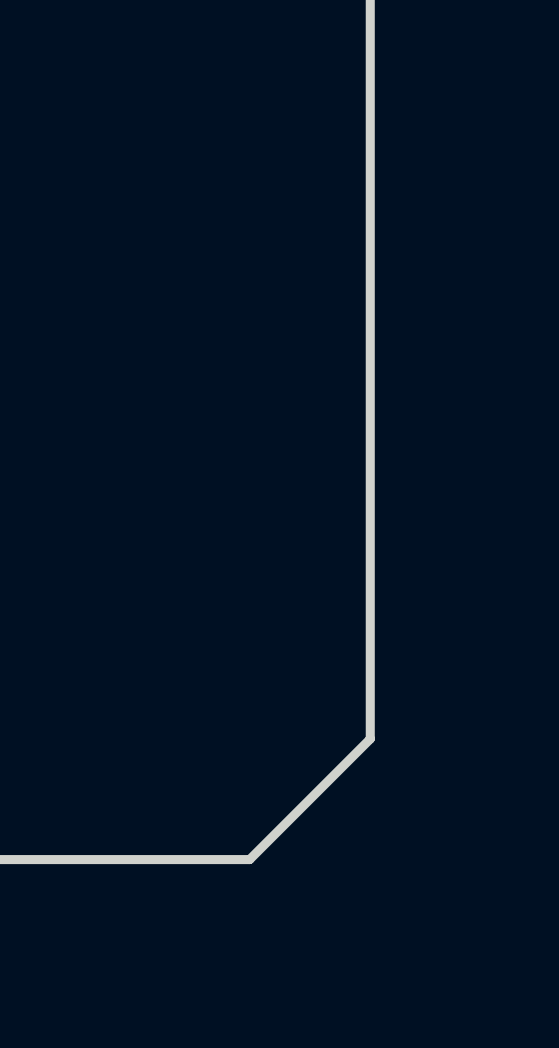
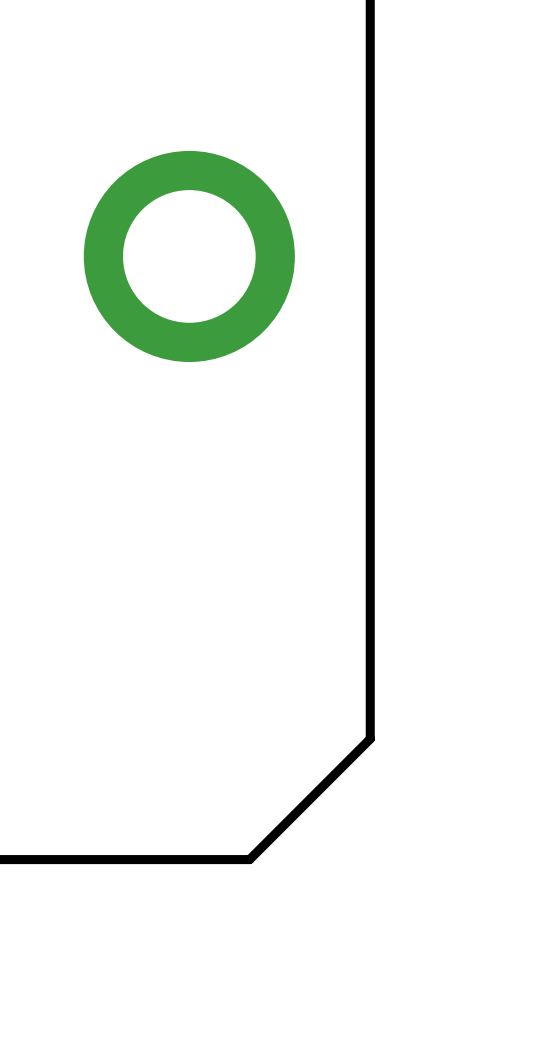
part: none -> (189, 256)

